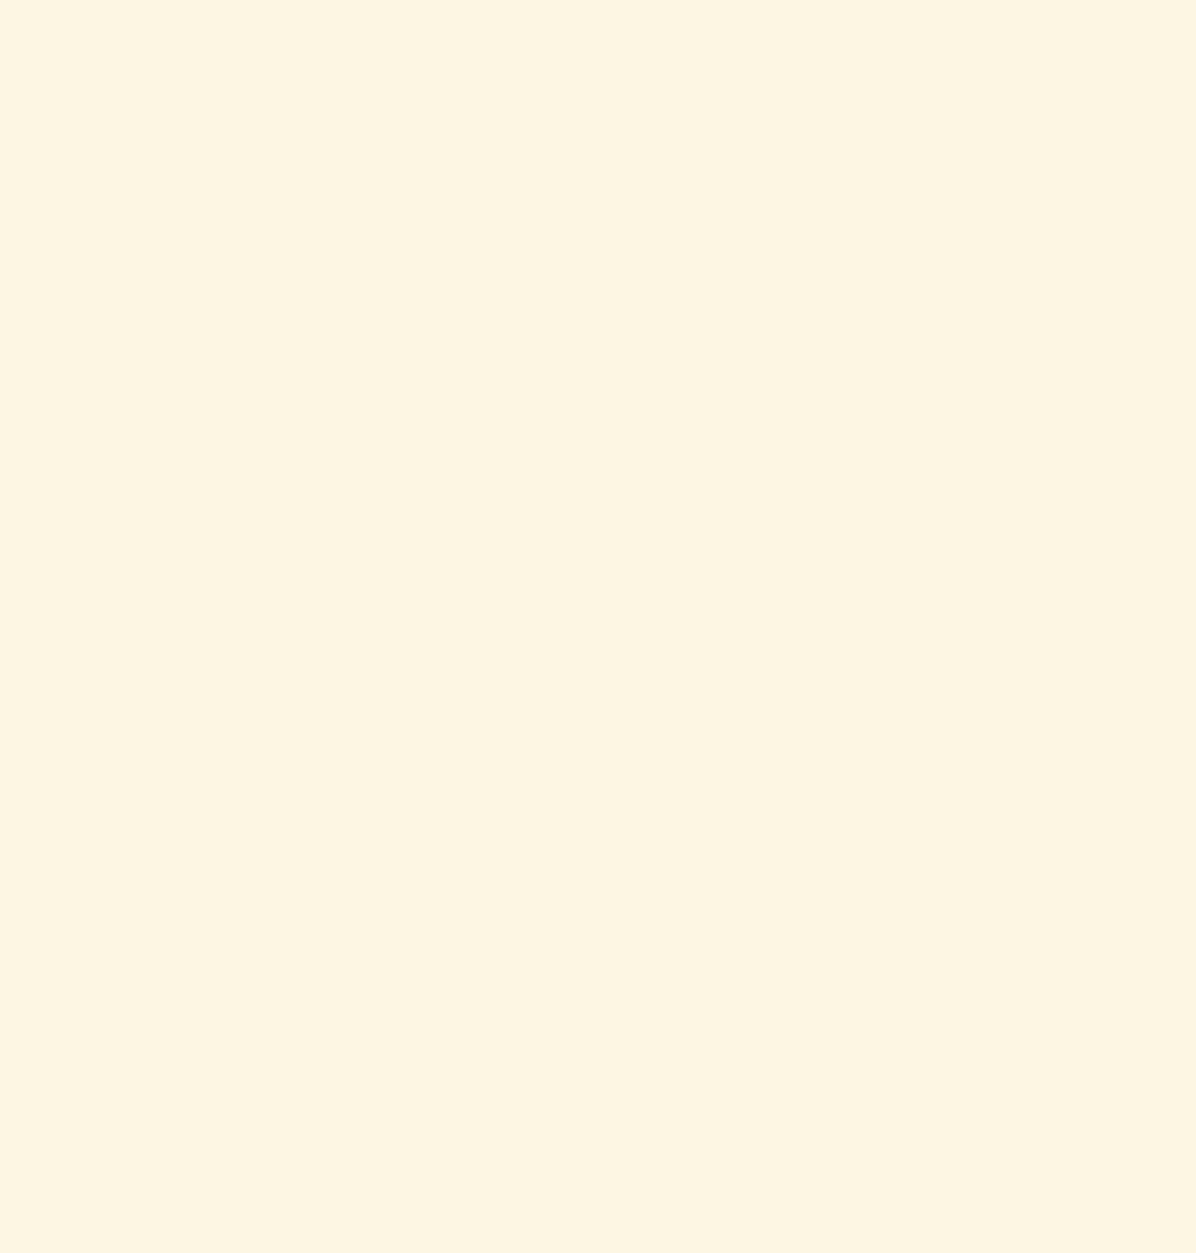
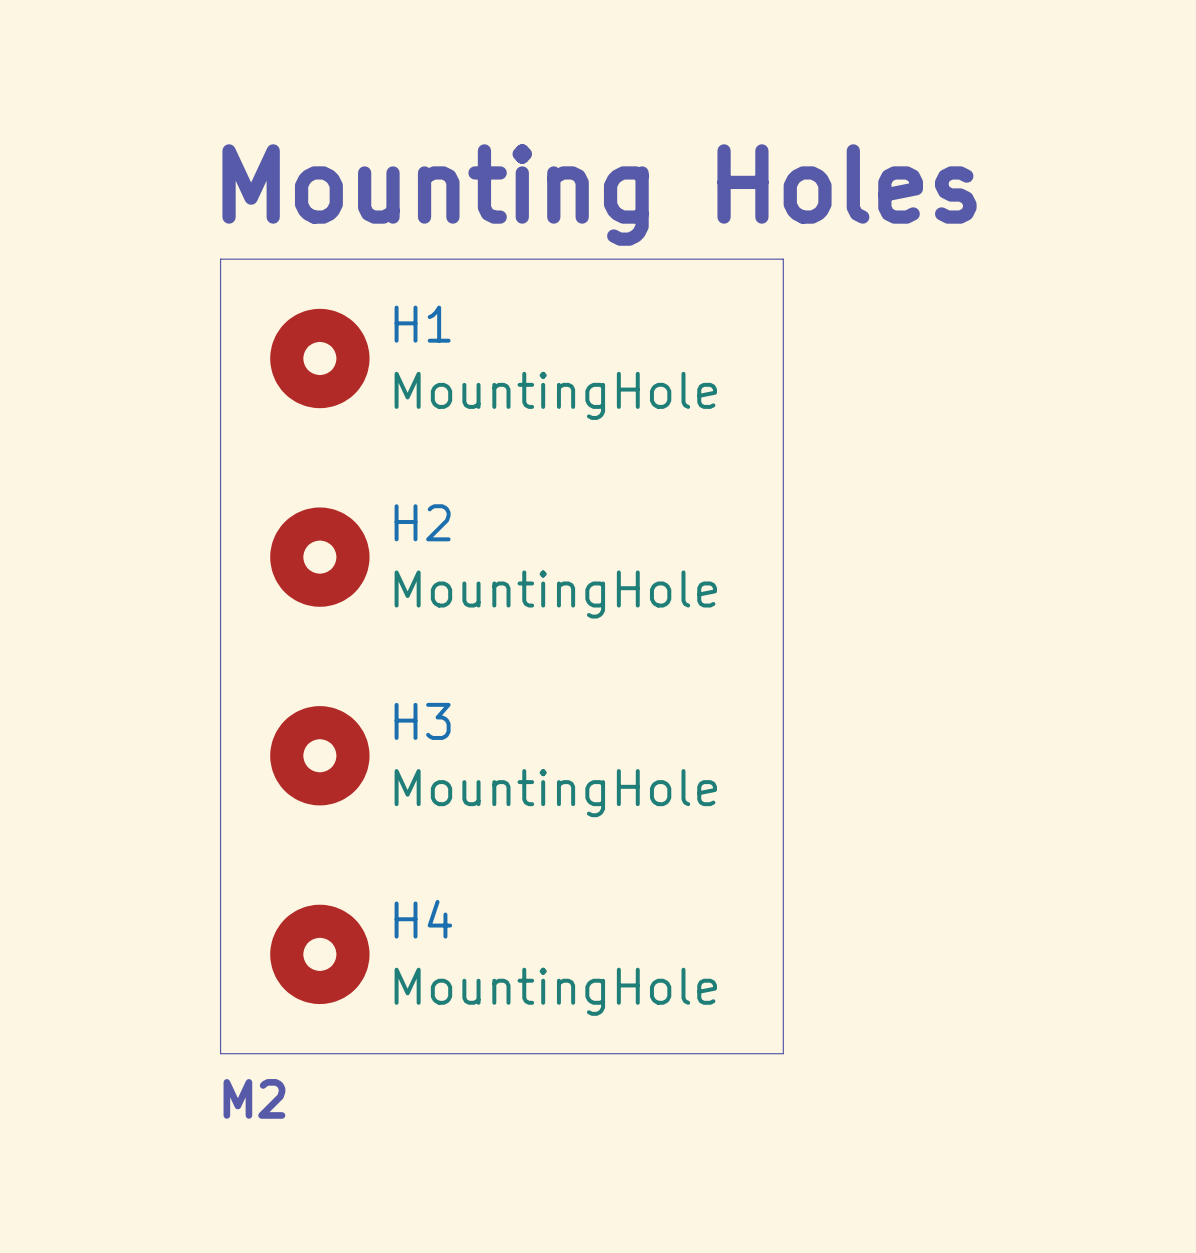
text: none -> Mounting Holes (599, 195)
line: none -> (220, 259) (783, 259) (783, 1053) (220, 1053) (220, 259)
H1: none -> MountingHole (319, 358)
H2: none -> MountingHole (319, 557)
H3: none -> MountingHole (319, 755)
H4: none -> MountingHole (319, 954)
text: none -> M2 (254, 1098)

